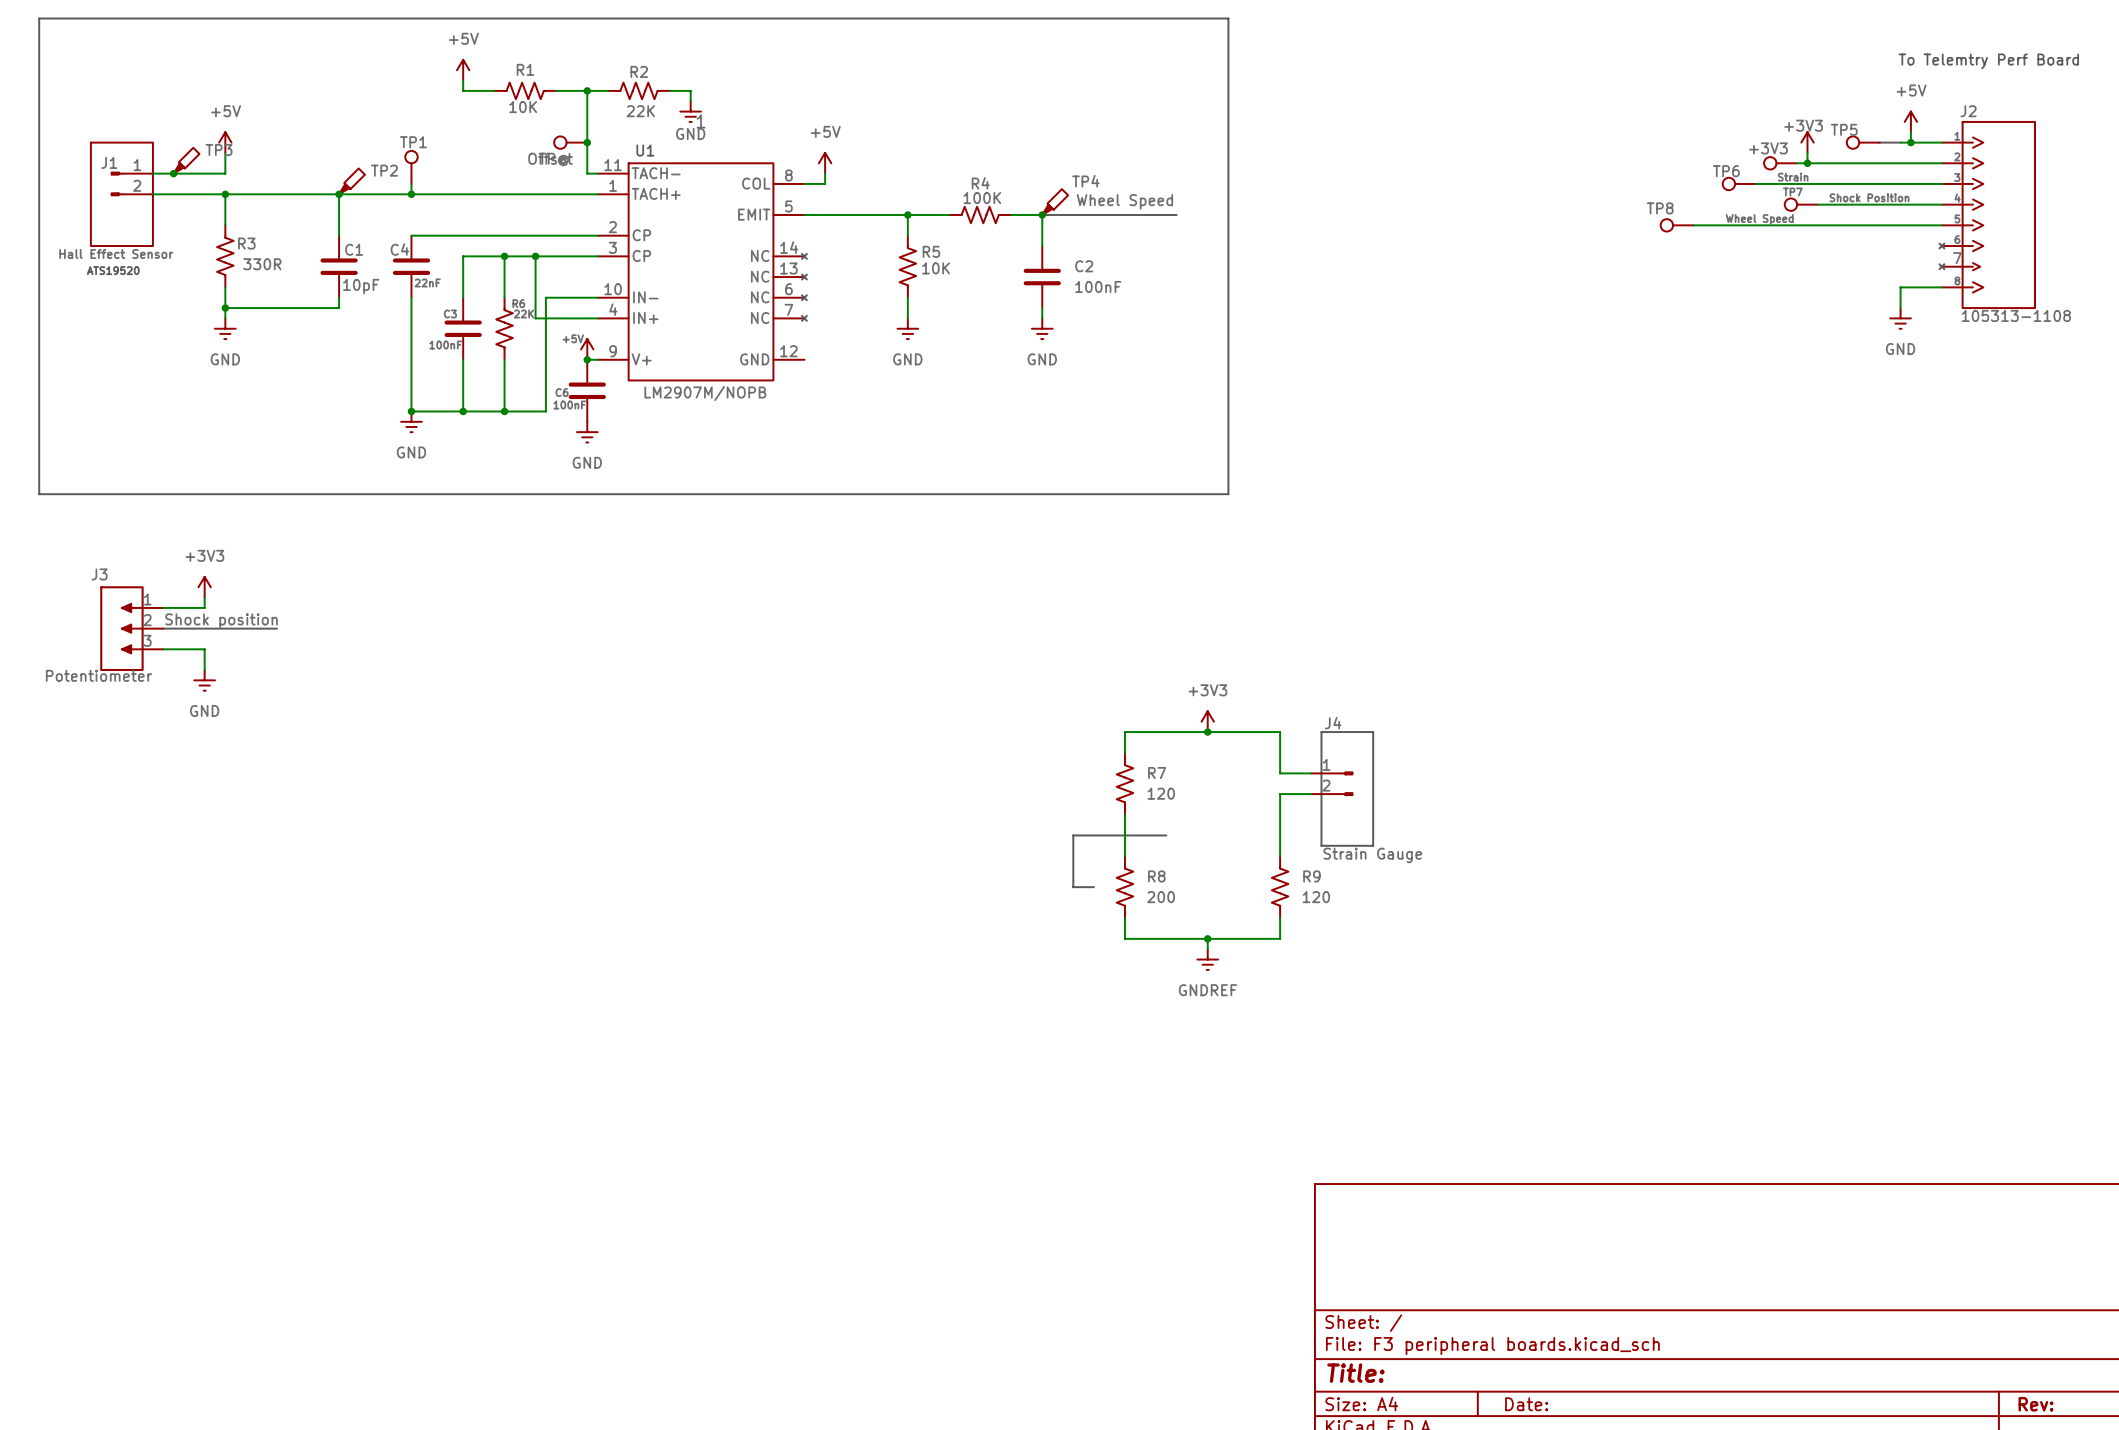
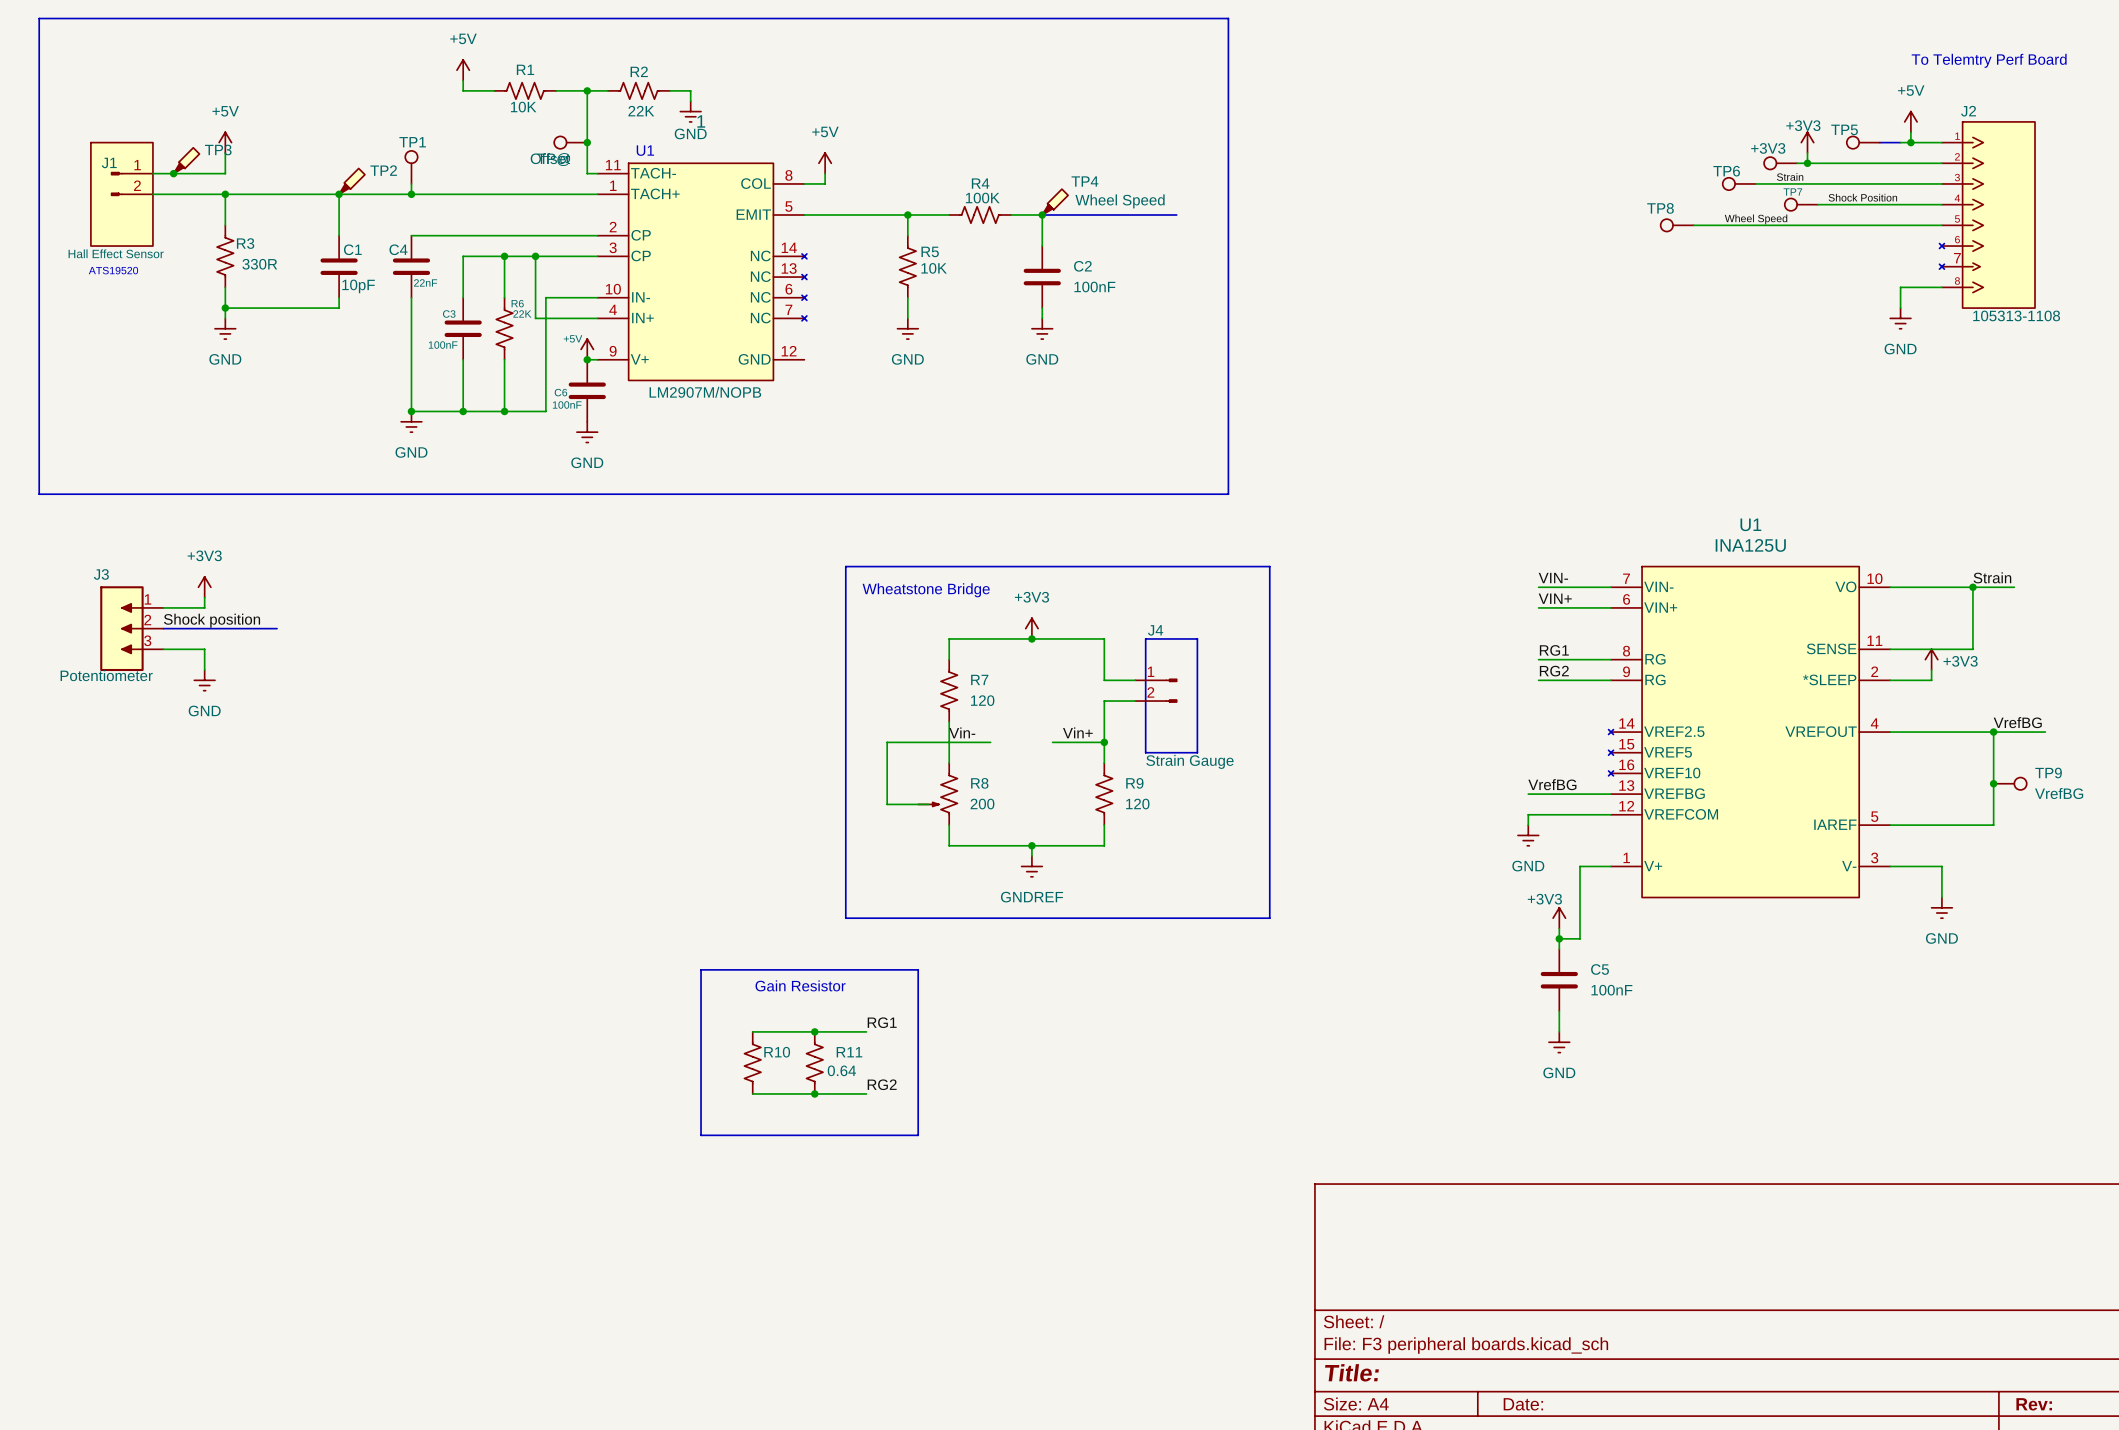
line: none -> (845, 566) (1269, 566) (1269, 918) (845, 918) (845, 566)
label: none -> VIN- (1553, 578)
label: none -> Strain (1992, 577)
wire: none -> (1538, 587) (1611, 587)
wire: none -> (1890, 587) (2014, 587)
wire: none -> (1972, 587) (1972, 649) (1890, 649)
junction: none -> (1972, 587)
text: none -> Wheatstone Bridge (926, 590)
label: none -> VIN+ (1555, 598)
wire: none -> (1538, 607) (1611, 607)
junction: none -> (1031, 638)
label: none -> RG1 (1554, 650)
wire: none -> (1538, 659) (1611, 659)
power symbol: none -> +3V3 (1931, 659)
wire: none -> (1931, 670) (1931, 680) (1890, 680)
label: none -> RG2 (1554, 671)
wire: none -> (1538, 680) (1611, 680)
power symbol position: +3V3 (1207, 721) -> +3V3 (1031, 628)
label: none -> VrefBG (2017, 722)
junction: (1207, 732) -> none
line: (1321, 732) (1373, 732) (1373, 845) (1321, 845) (1321, 732) -> (1145, 638) (1197, 638) (1197, 752) (1145, 752) (1145, 638)
U1: none -> INA125U (1749, 732)
wire: none -> (1890, 732) (2045, 732)
wire: none -> (1993, 732) (1993, 825) (1890, 825)
junction: none -> (1993, 732)
label: none -> Vin- (962, 732)
label: none -> Vin+ (1077, 732)
wire: none -> (990, 742) (887, 742) (887, 804) (928, 804)
wire: none -> (1052, 742) (1104, 742)
junction: none -> (1104, 742)
wire: (1125, 752) (1125, 732) (1280, 732) (1280, 773) (1311, 773) -> (949, 659) (949, 638) (1104, 638) (1104, 680) (1135, 680)
R7 position: (1125, 783) -> (949, 690)
J4 position: (1332, 783) -> (1156, 690)
junction: none -> (1993, 783)
TP9: none -> VrefBG (2010, 783)
label: none -> VrefBG (1552, 784)
wire: (1311, 794) (1280, 794) (1280, 856) -> (1135, 701) (1104, 701) (1104, 763)
wire: none -> (1528, 794) (1611, 794)
power symbol: none -> (928, 804)
wire: (1125, 814) (1125, 856) -> (949, 721) (949, 763)
wire: none -> (1611, 814) (1528, 814) (1528, 825)
line: (1166, 835) (1073, 835) (1073, 887) (1093, 887) -> none
power symbol: none -> GND (1528, 835)
junction: none -> (1031, 845)
wire: none -> (1611, 866) (1580, 866) (1580, 938) (1559, 938)
wire: none -> (1890, 866) (1941, 866) (1941, 897)
R8 position: (1125, 887) -> (949, 794)
R9 position: (1280, 887) -> (1104, 794)
power symbol: none -> GND (1941, 907)
wire: (1125, 918) (1125, 938) (1280, 938) (1280, 918) -> (949, 825) (949, 845) (1104, 845) (1104, 825)
power symbol: none -> +3V3 (1559, 918)
wire: none -> (1559, 928) (1559, 949)
wire: (1207, 938) (1207, 949) -> (1031, 845) (1031, 856)
junction: (1207, 938) -> none
junction: none -> (1559, 938)
power symbol position: GNDREF (1207, 959) -> GNDREF (1031, 866)
line: none -> (701, 969) (918, 969) (918, 1135) (701, 1135) (701, 969)
C5: none -> 100nF (1559, 980)
text: none -> Gain Resistor (800, 985)
wire: none -> (1559, 1011) (1559, 1031)
label: none -> RG1 (882, 1022)
wire: none -> (752, 1031) (866, 1031)
junction: none -> (814, 1031)
power symbol: none -> GND (1559, 1042)
R10: none -> (752, 1062)
R11: none -> 0.64 (814, 1062)
label: none -> RG2 (882, 1084)
wire: none -> (752, 1093) (866, 1093)
junction: none -> (814, 1093)

